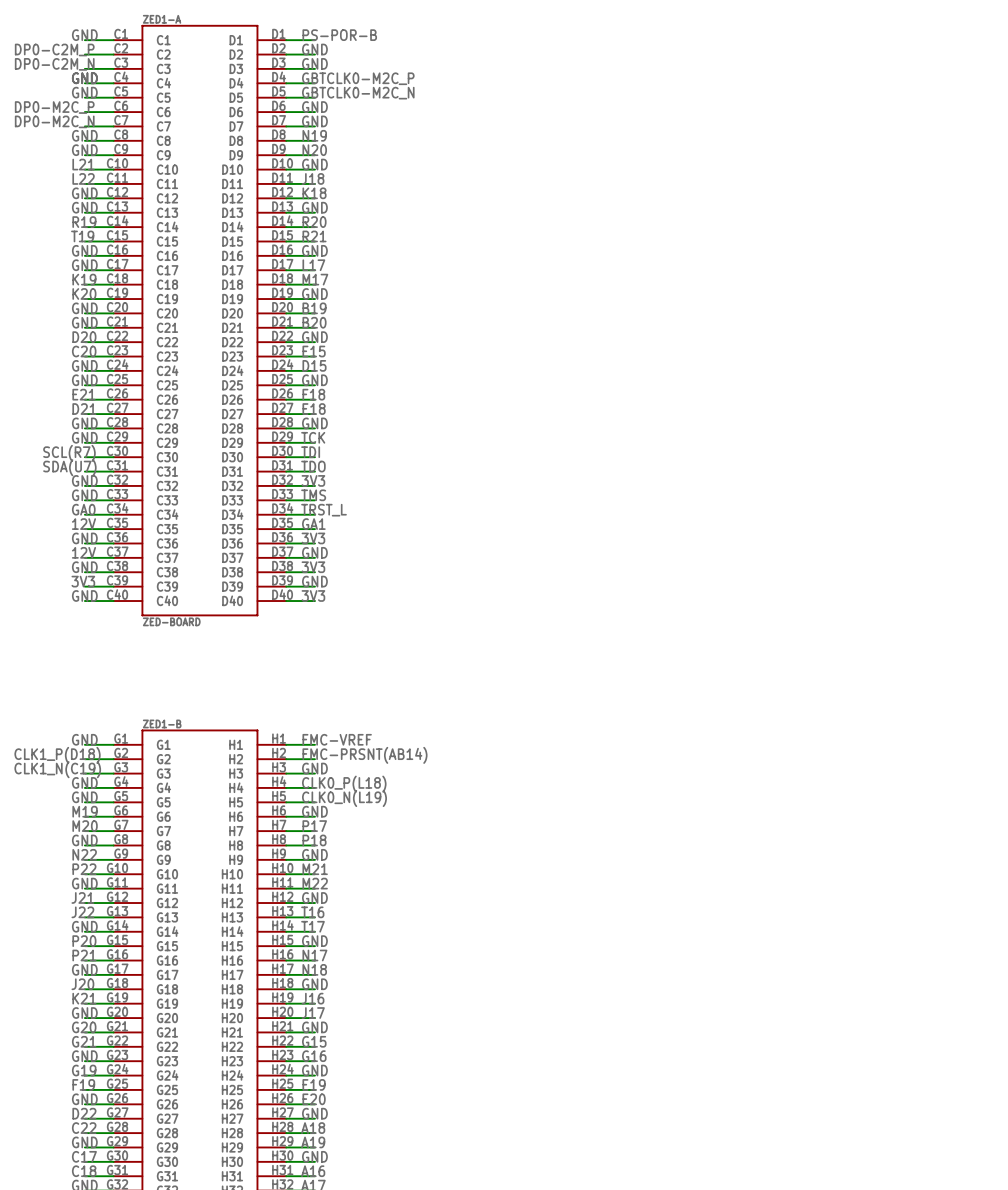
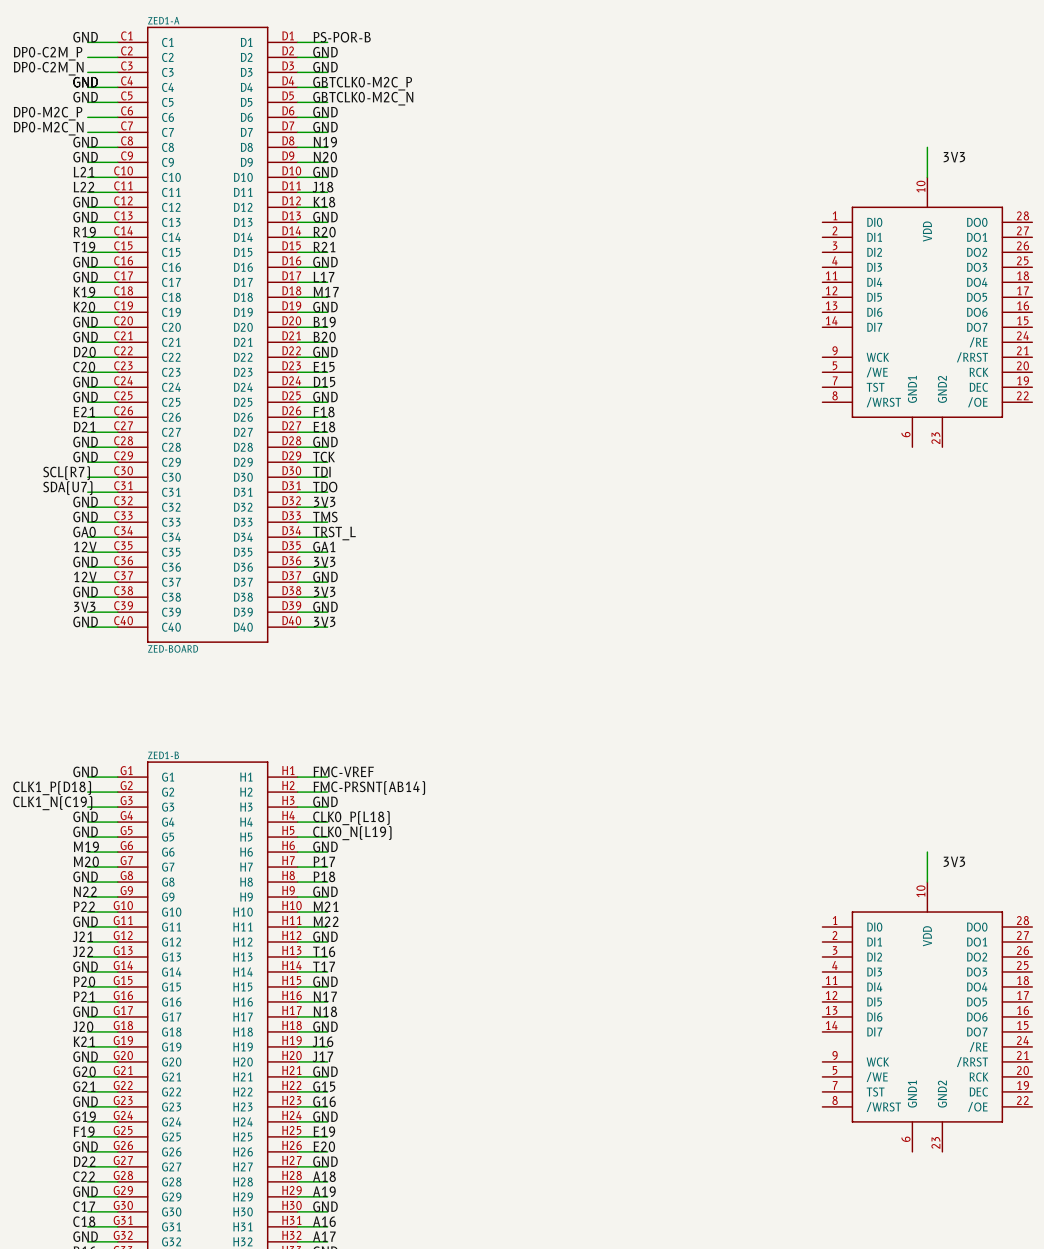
wire: none -> (927, 147) (927, 177)
label: none -> 3V3 (954, 157)
part: none -> (927, 312)
wire: none -> (927, 852) (927, 882)
label: none -> 3V3 (954, 861)
part: none -> (927, 1016)

